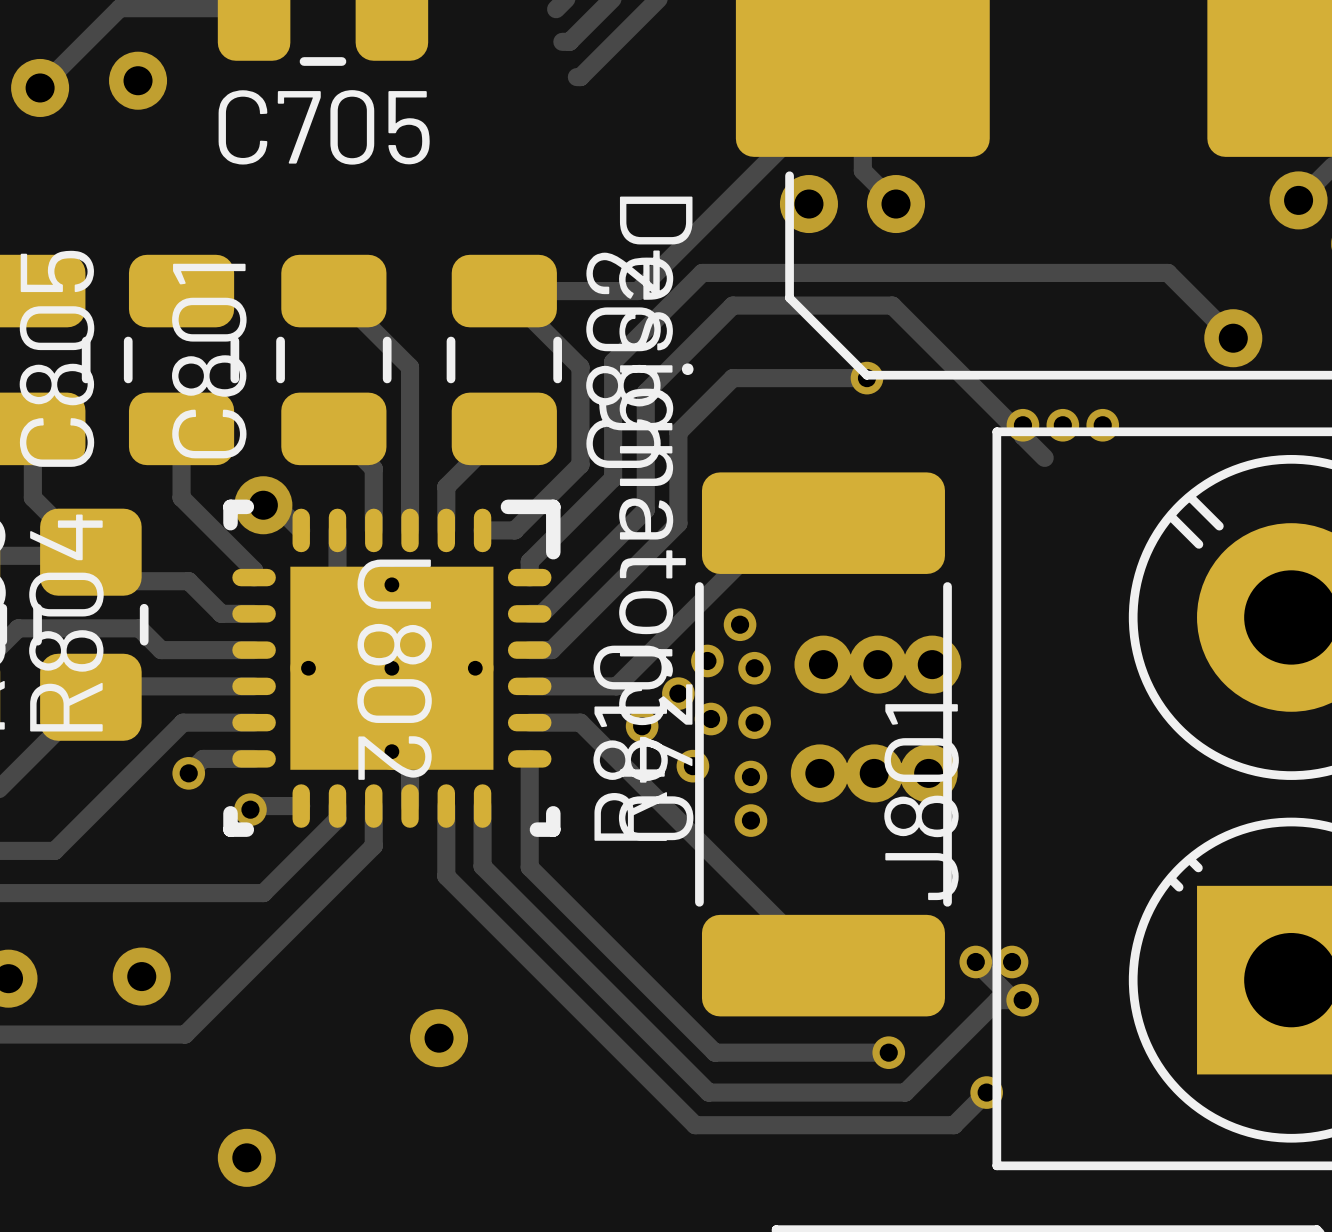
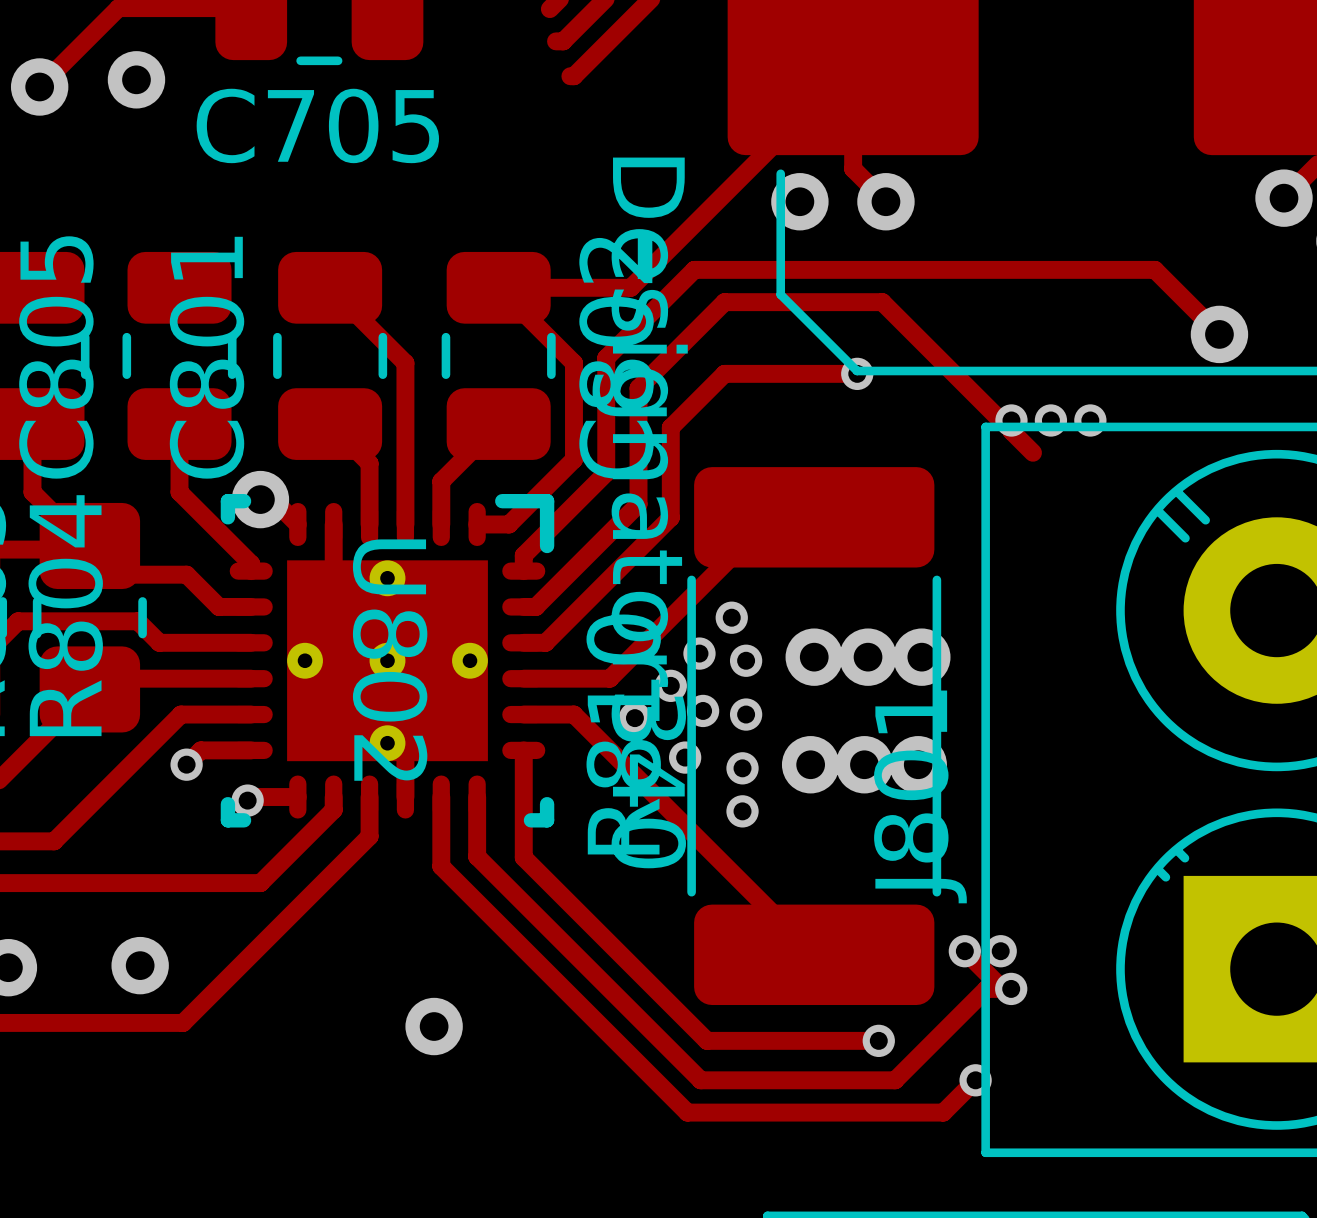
via: (246, 1157) -> none

